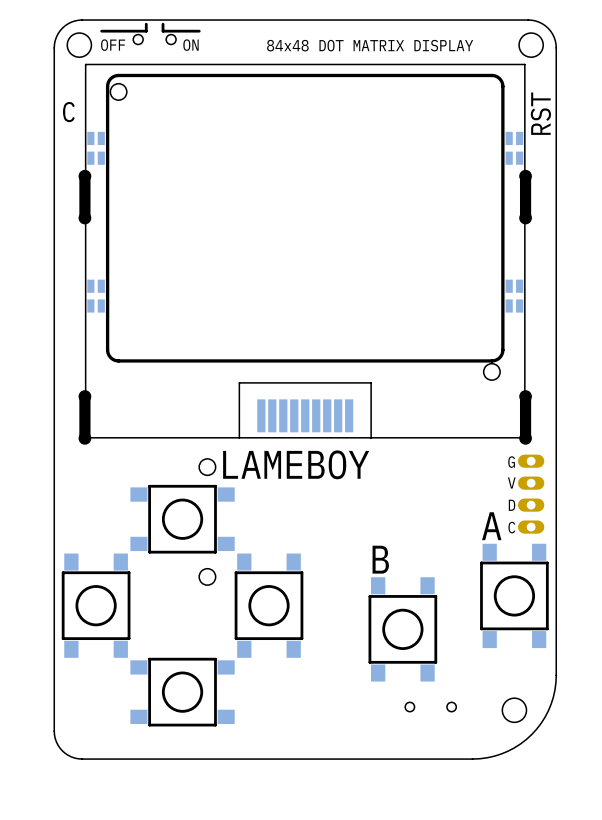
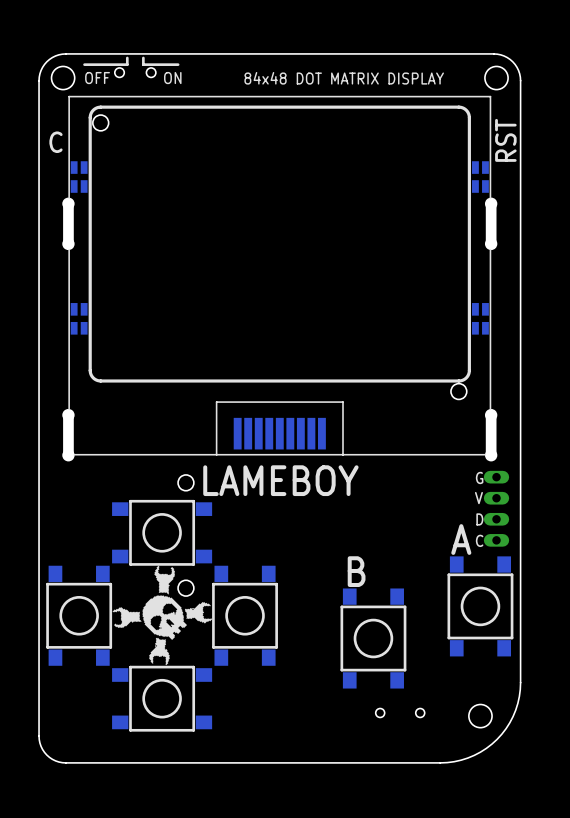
drawing: none -> [112, 565, 213, 666]

